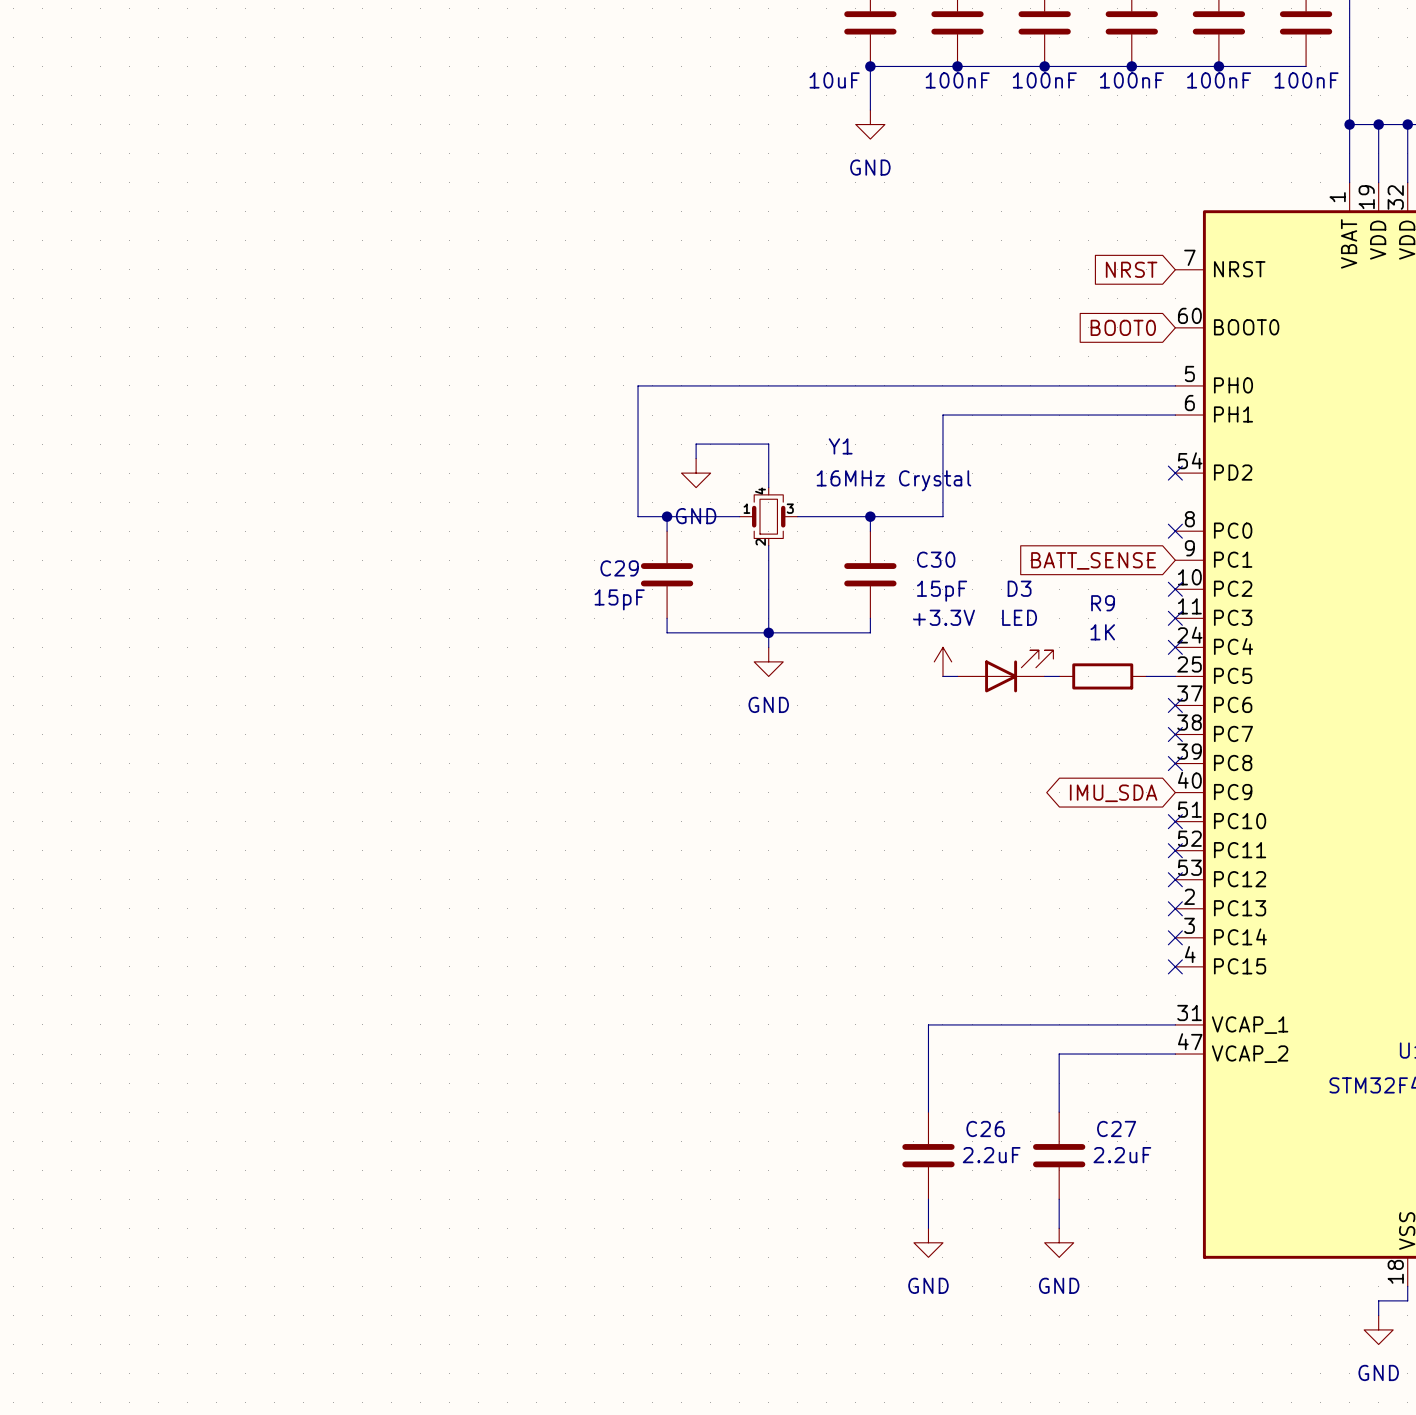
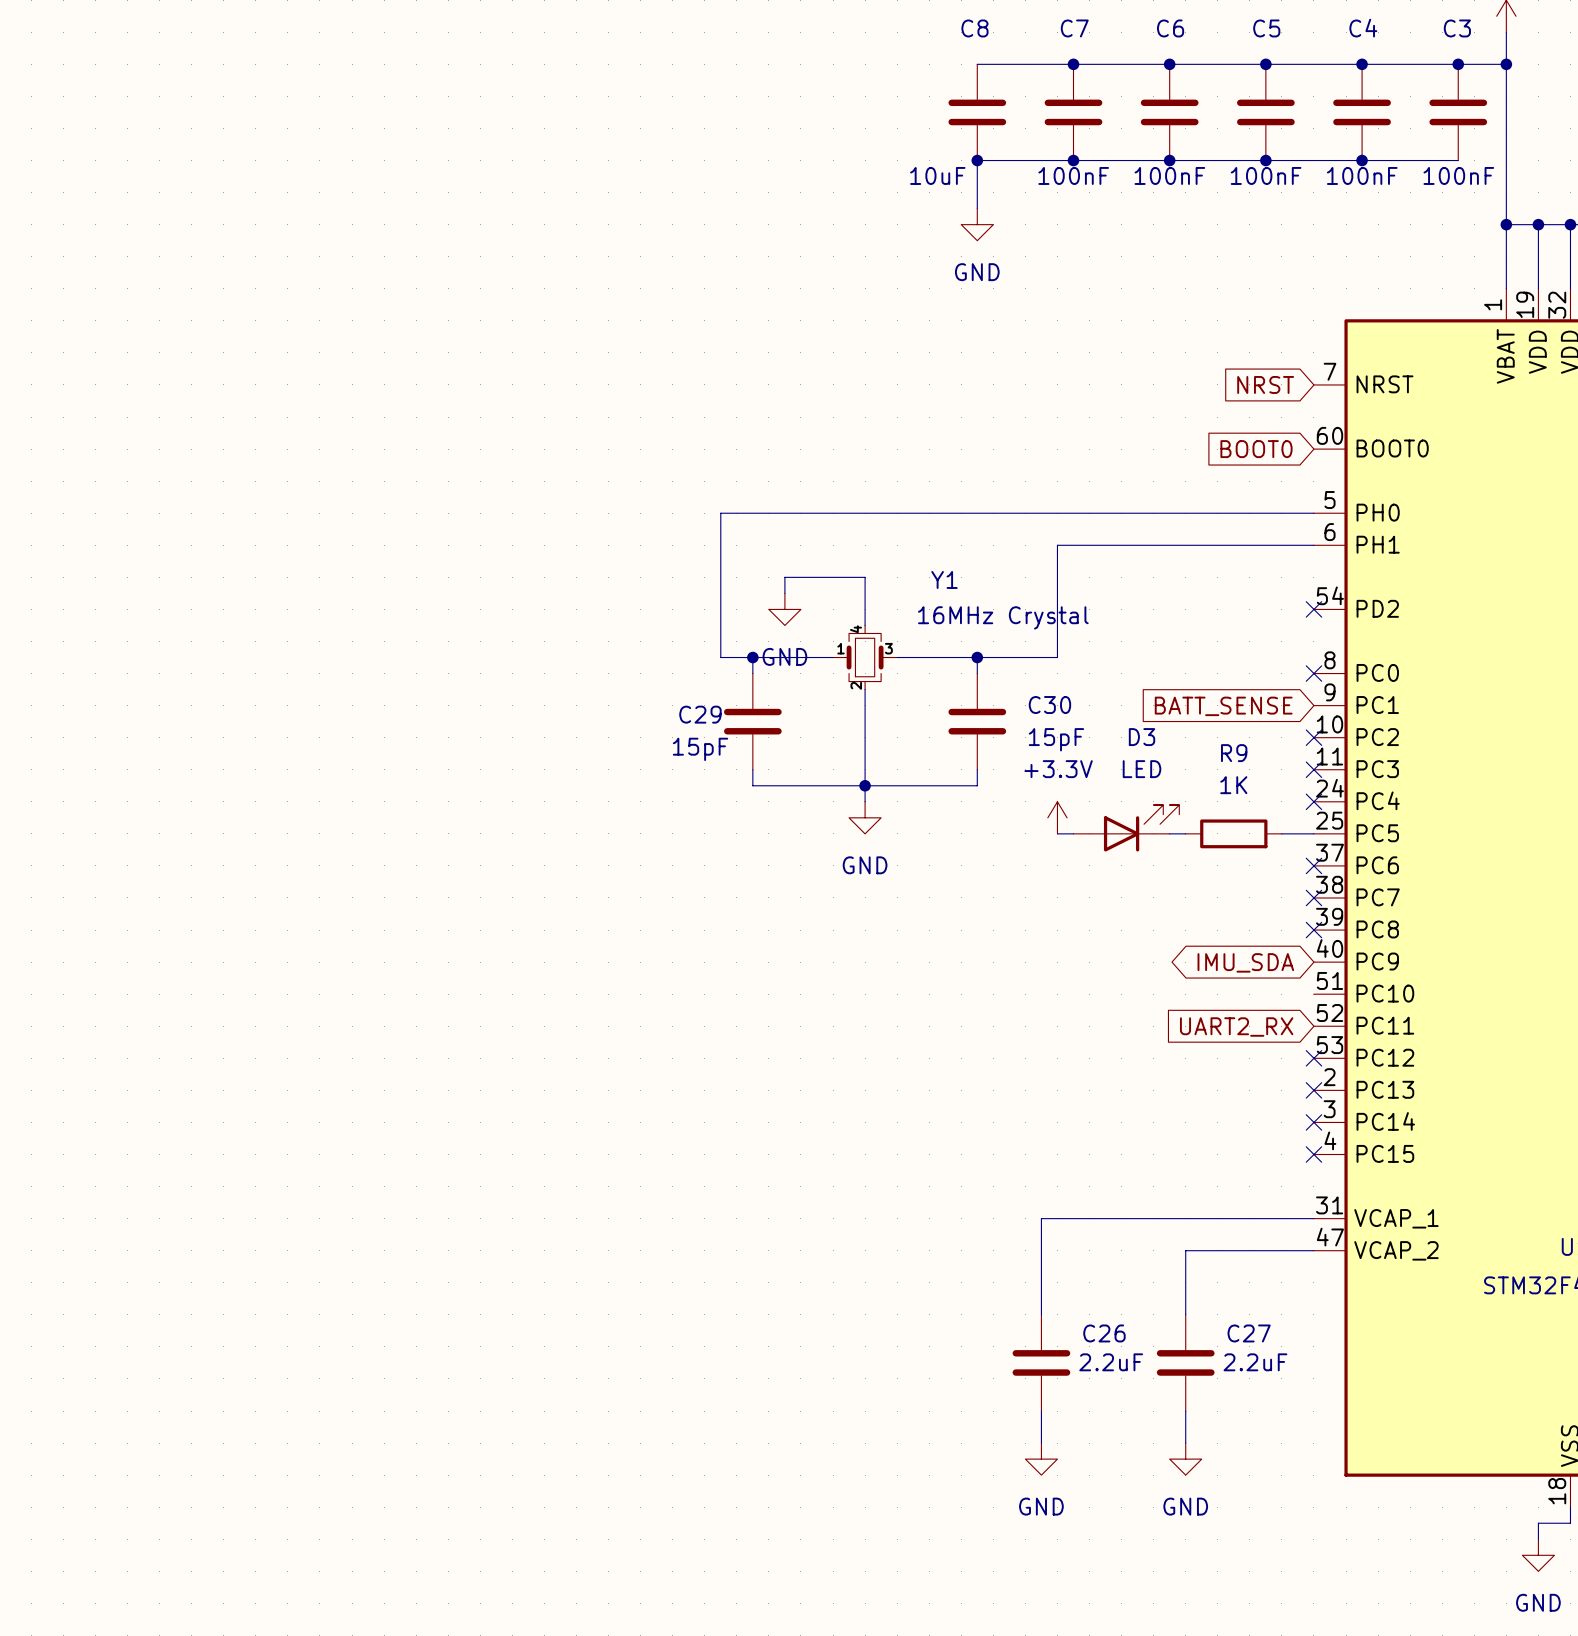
no-connect mark: (1175, 821) -> none
no-connect mark: (1175, 850) -> none
global label: none -> UART2_RX (1236, 1027)

